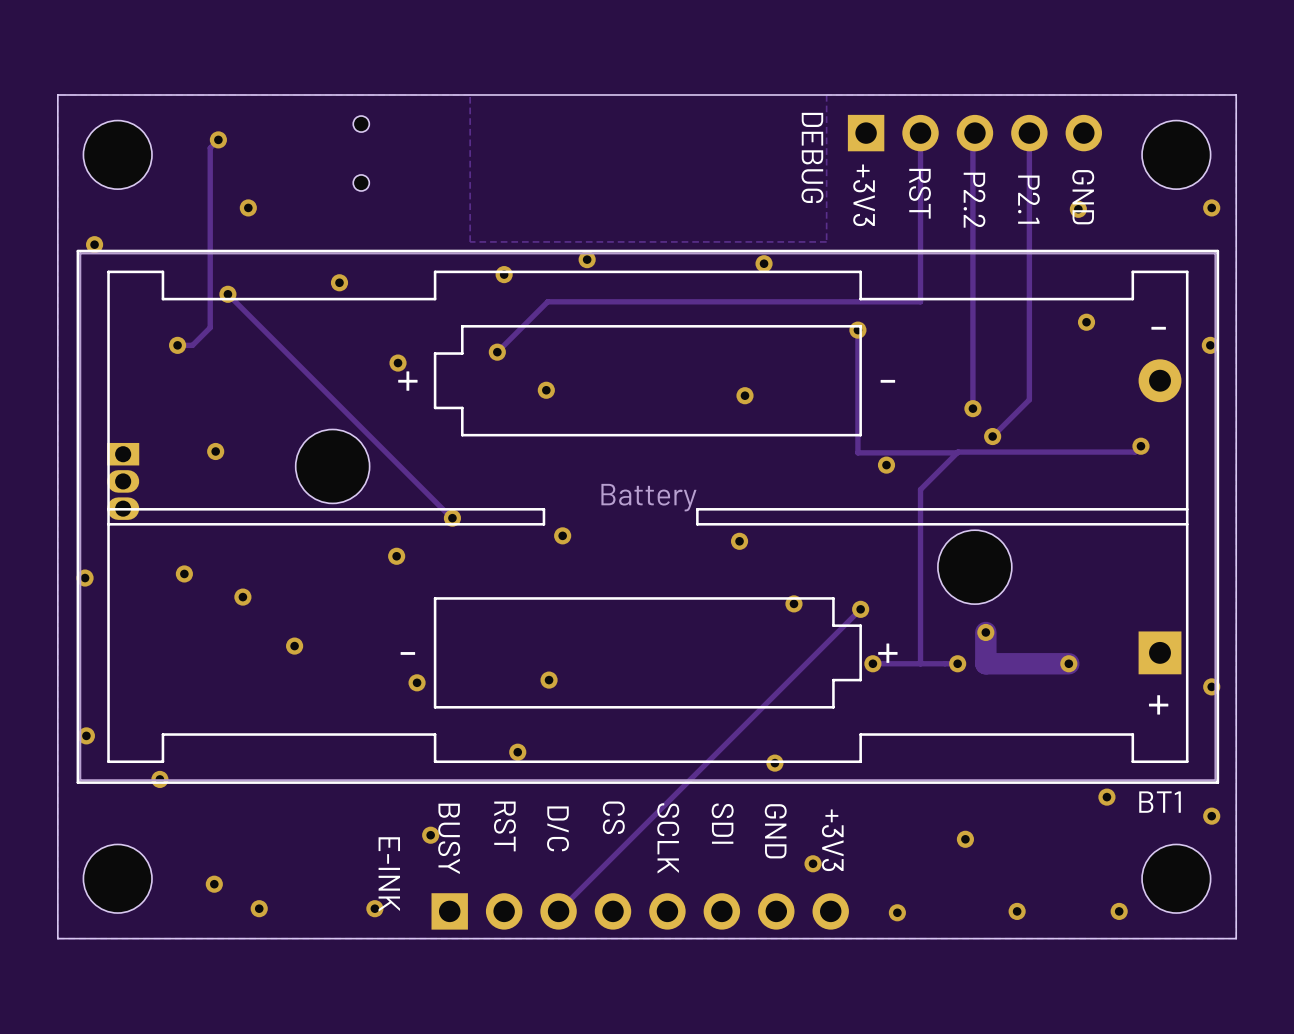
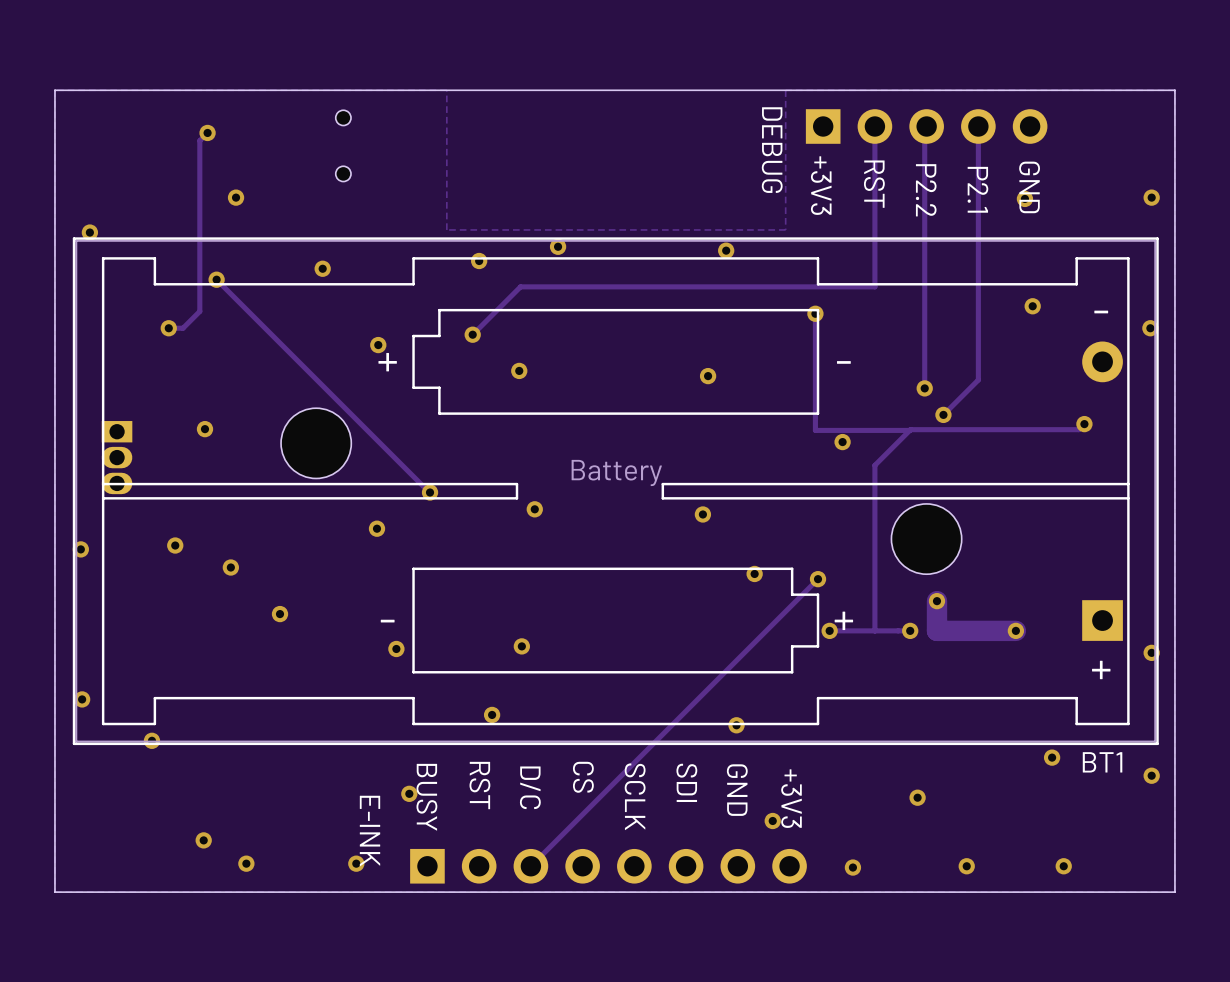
part: (117, 154) -> none
part: (1176, 154) -> none
part: (117, 878) -> none
part: (1176, 878) -> none

